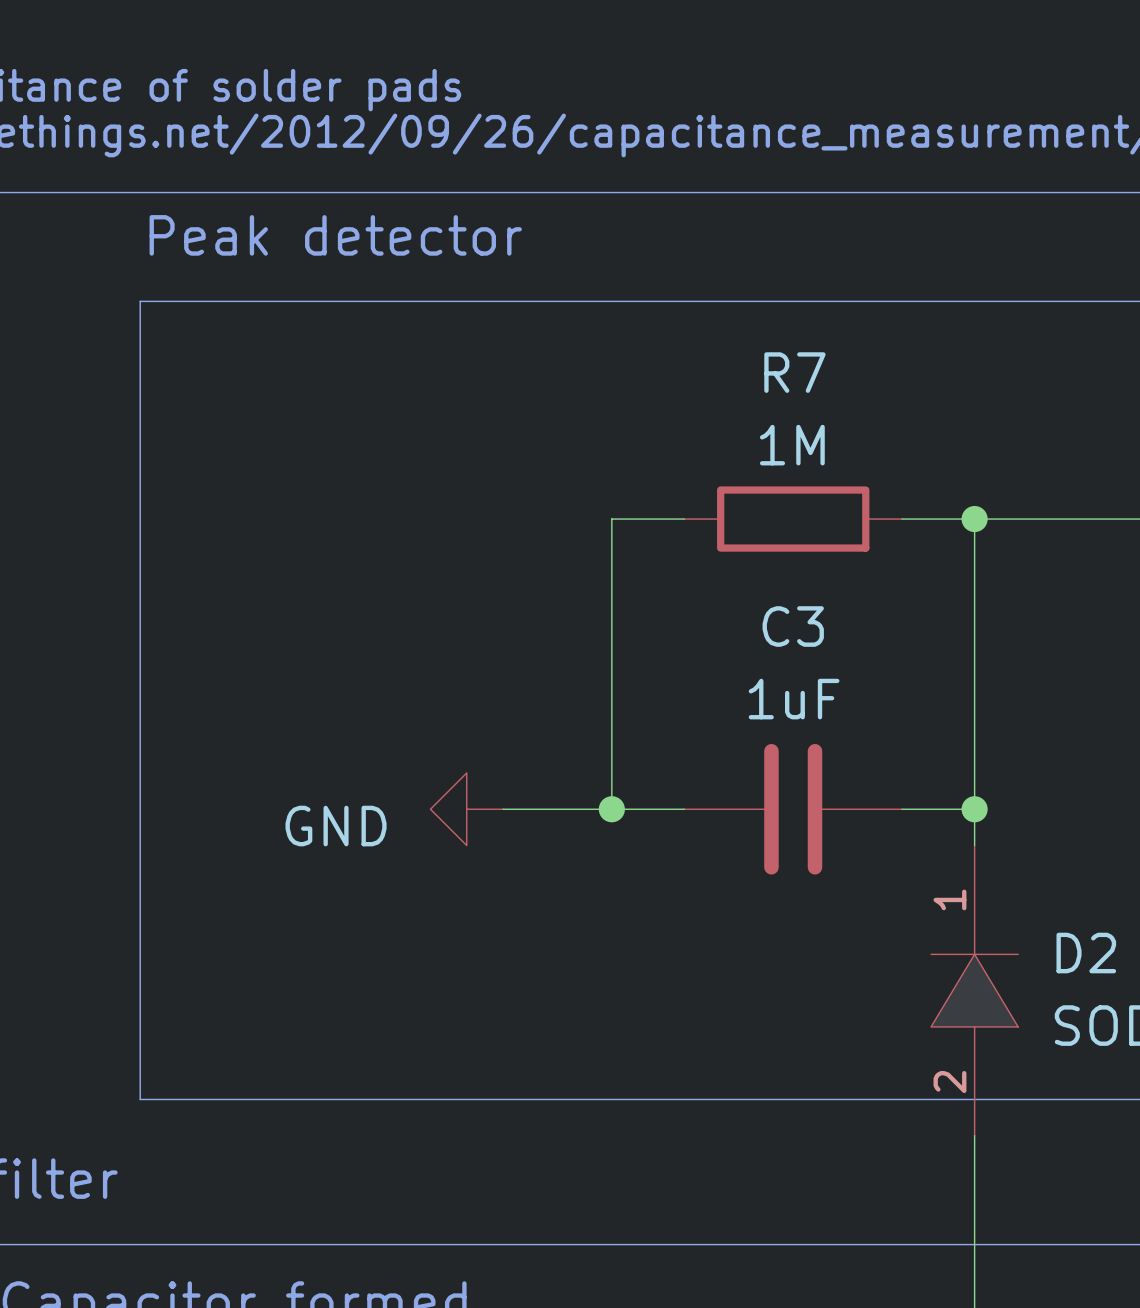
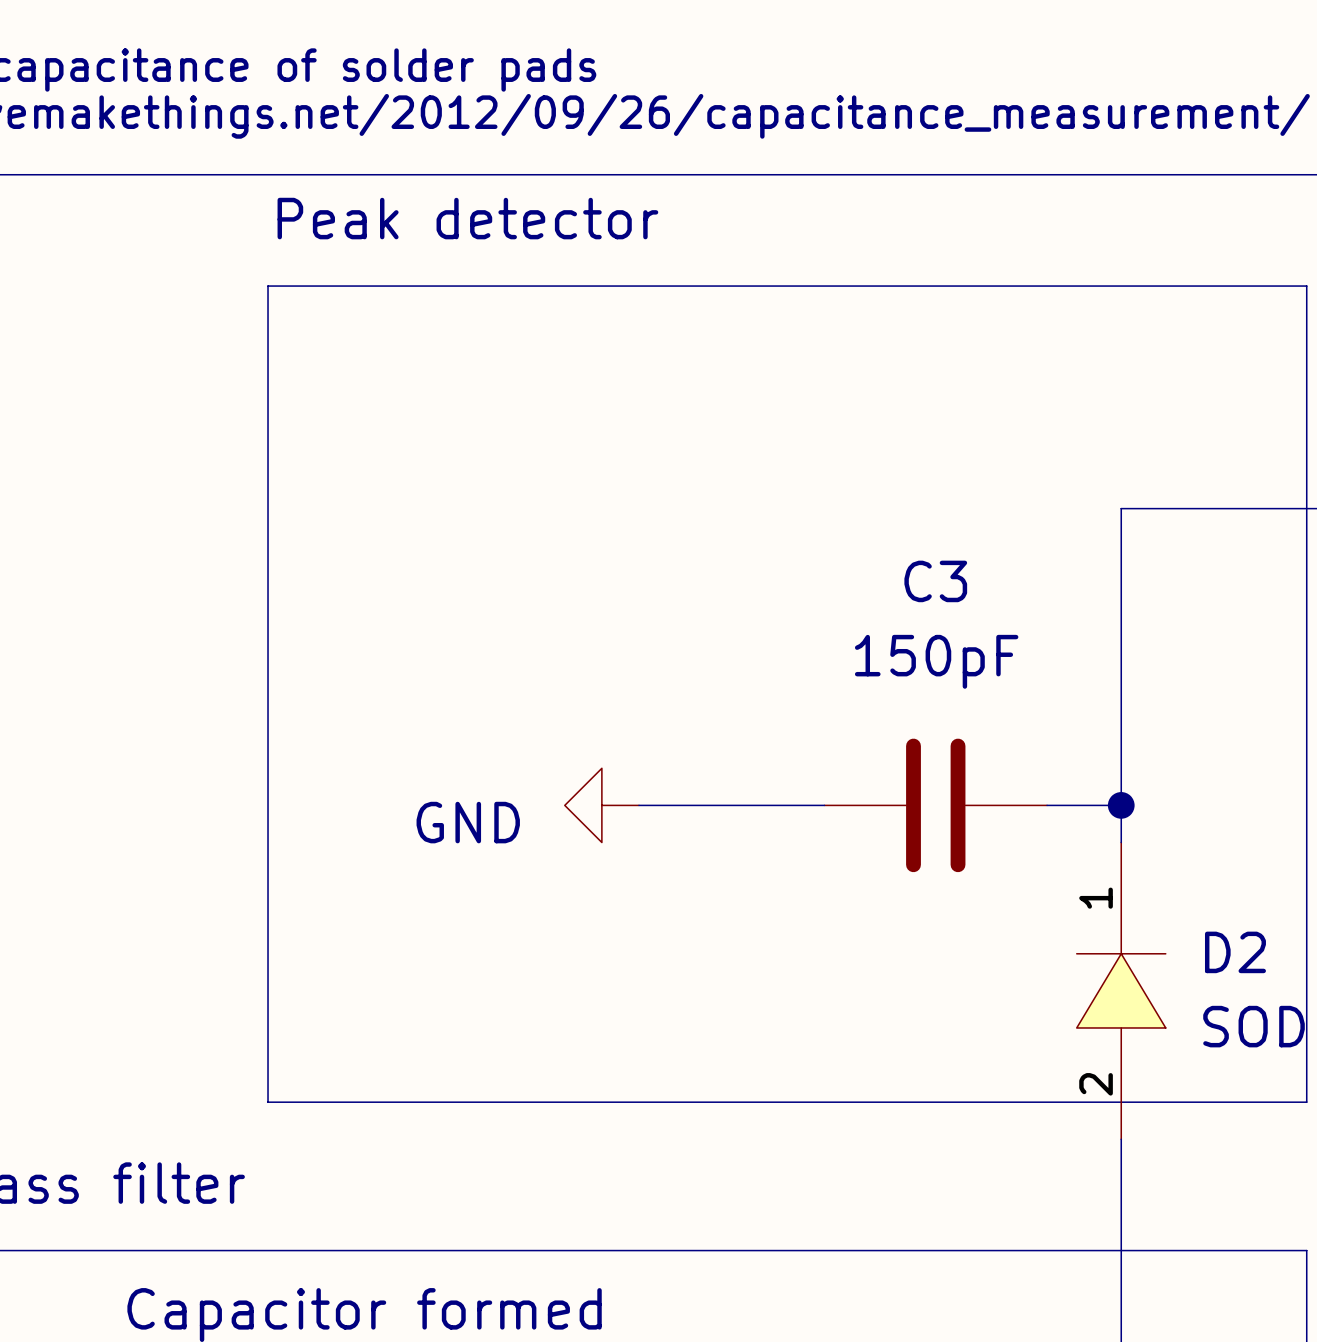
wire: (684, 519) (611, 519) (611, 809) -> none
R7: 1M (793, 519) -> none
wire: (902, 519) (974, 519) -> none
junction: (974, 519) -> none
C3 name position: C3 (793, 626) -> C3 (935, 581)
C3 value: 1uF (794, 699) -> 150pF (936, 661)
junction: (611, 809) -> none

